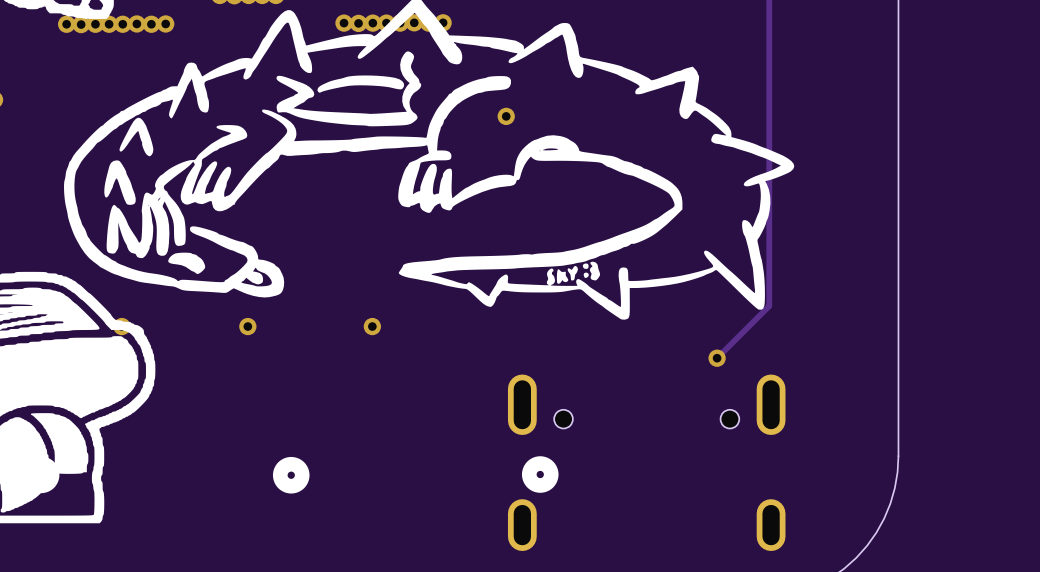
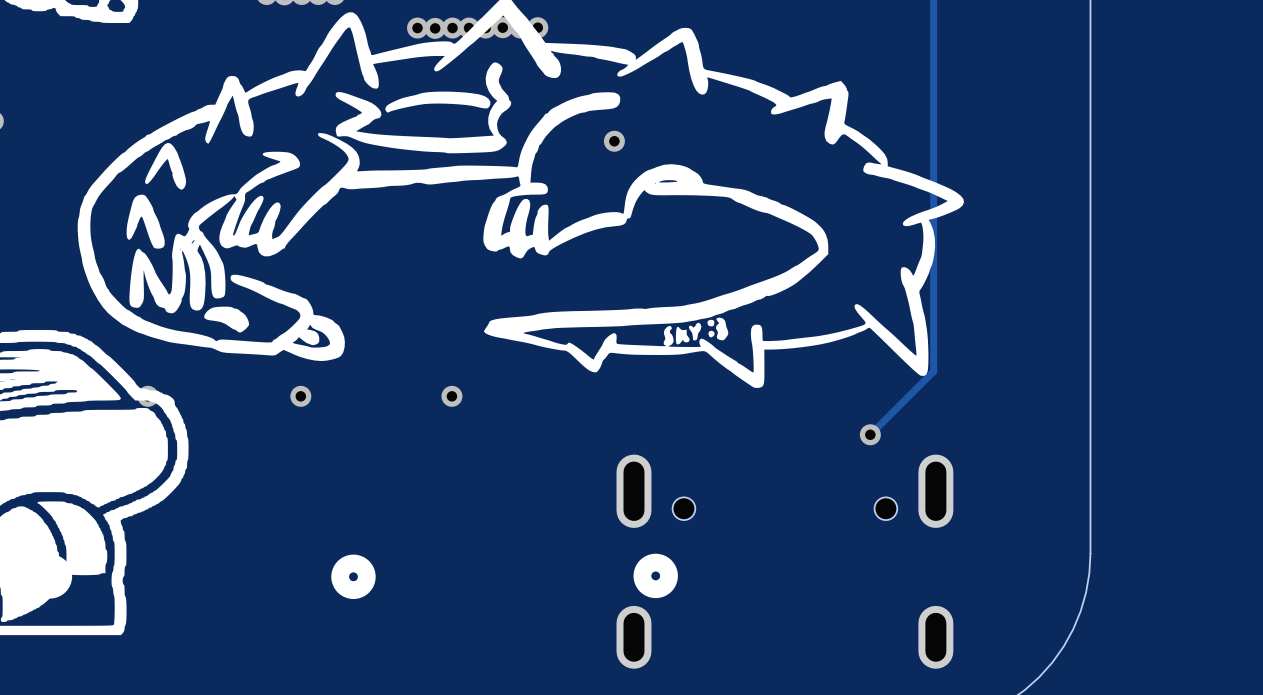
via: (136, 23) -> none
via: (165, 23) -> none
via: (66, 24) -> none
via: (81, 24) -> none
via: (95, 24) -> none
via: (109, 24) -> none
via: (122, 24) -> none
via: (151, 24) -> none

